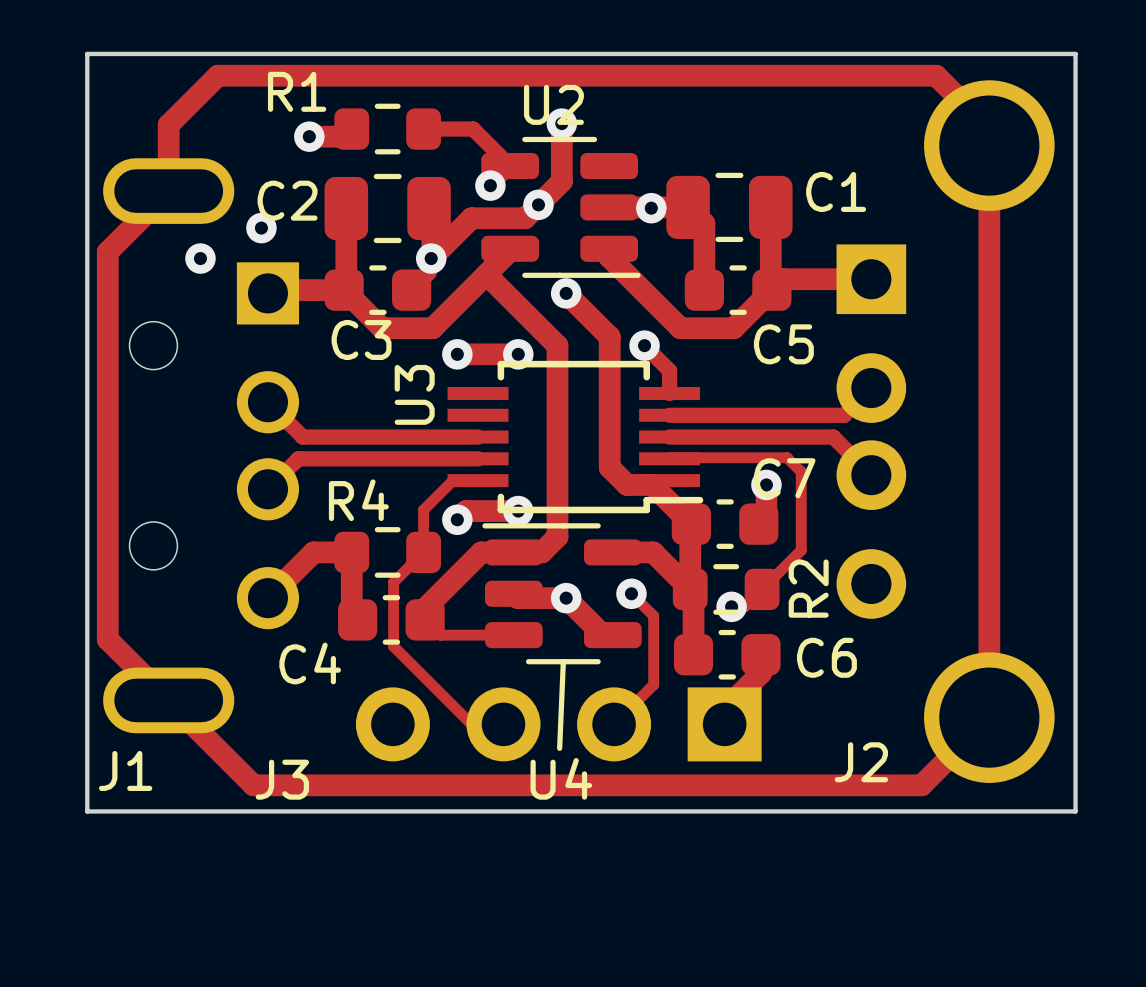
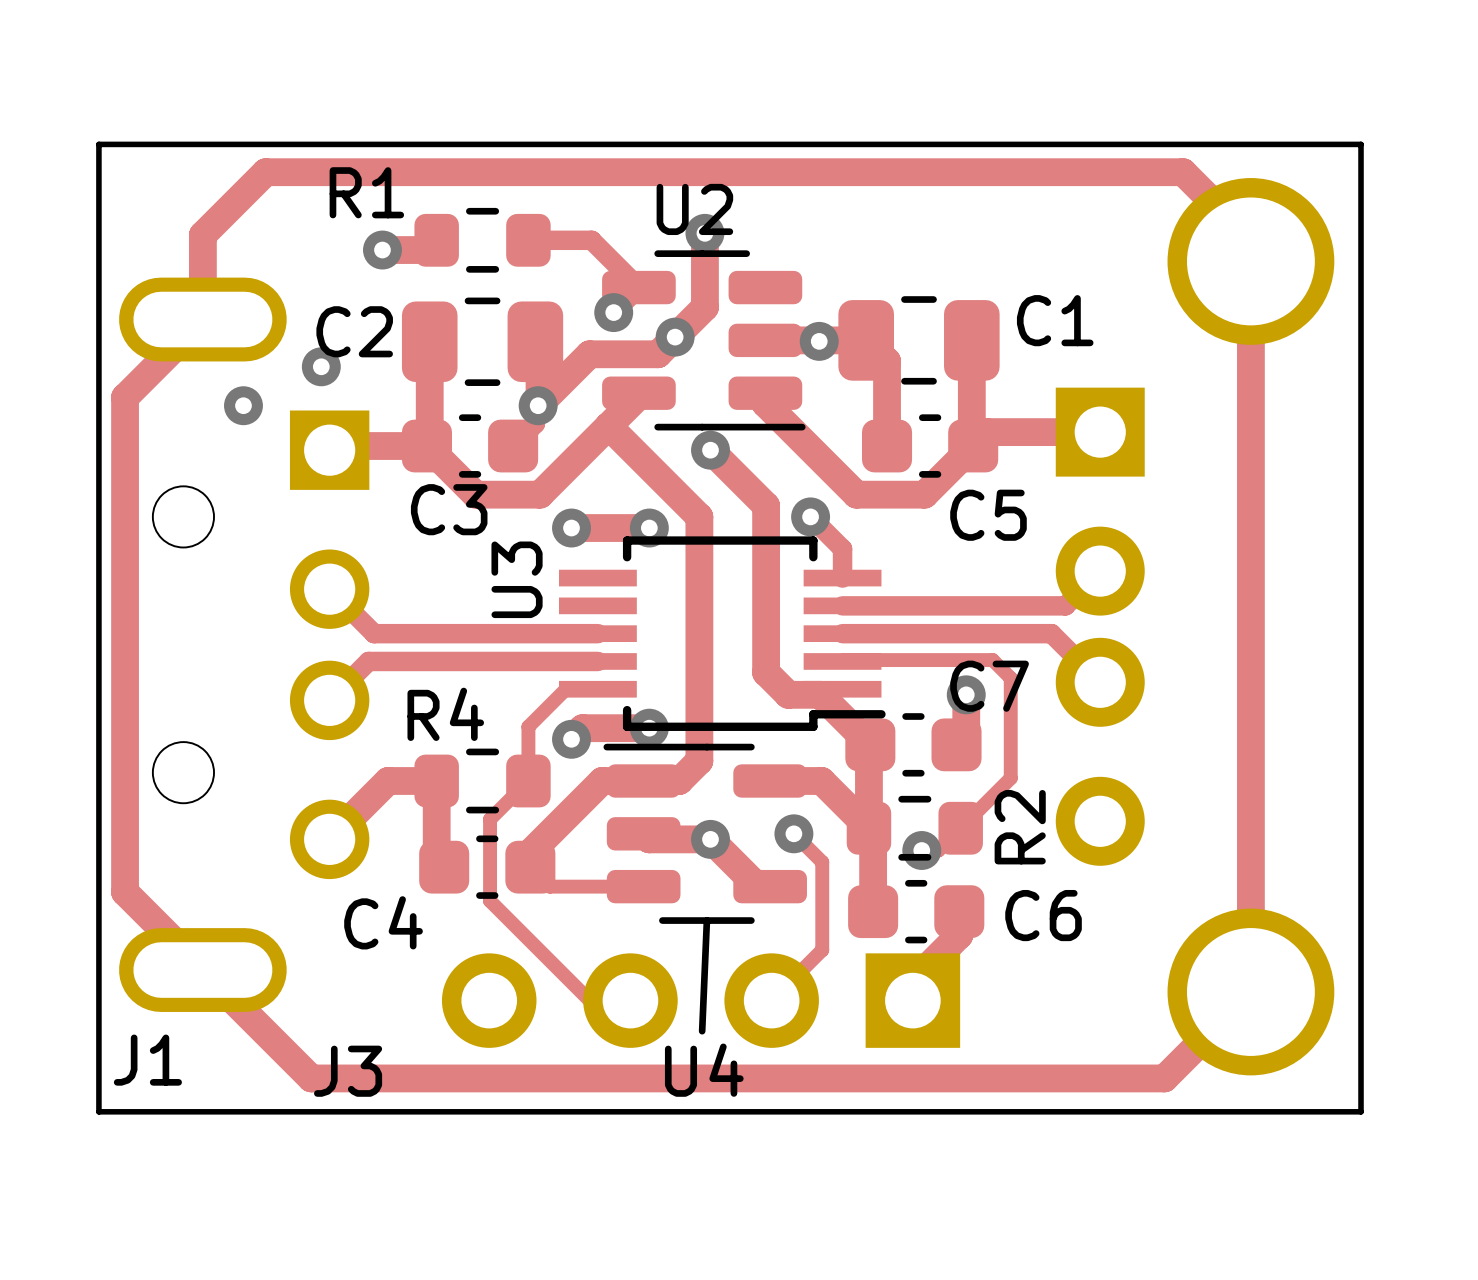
J2 name: J2 (861, 762) -> none

